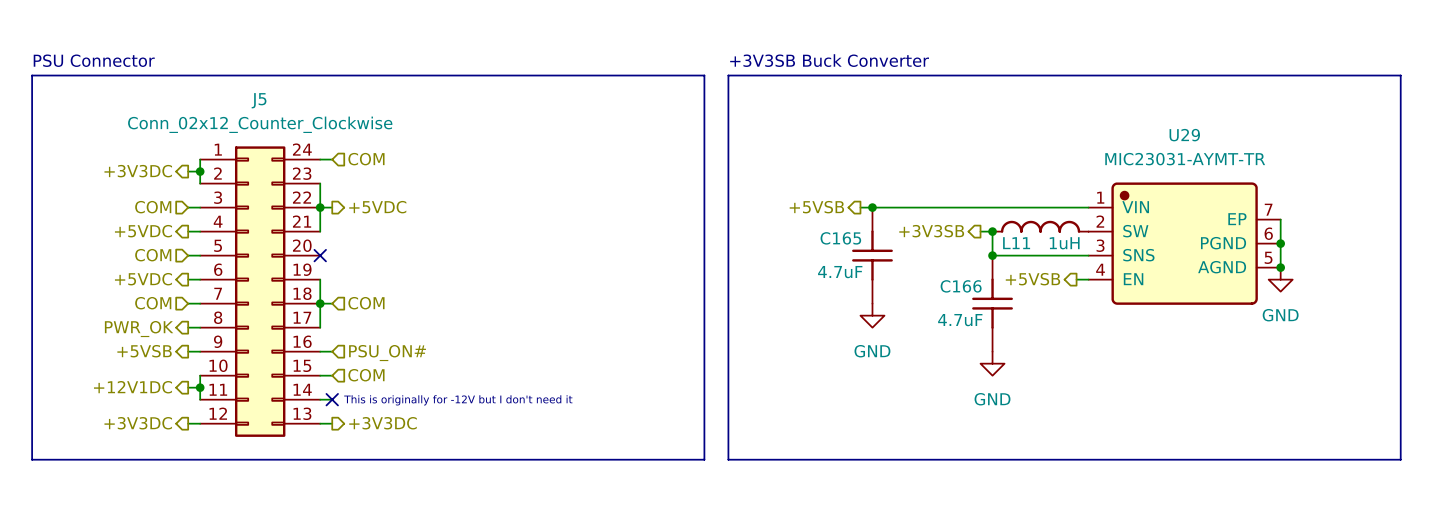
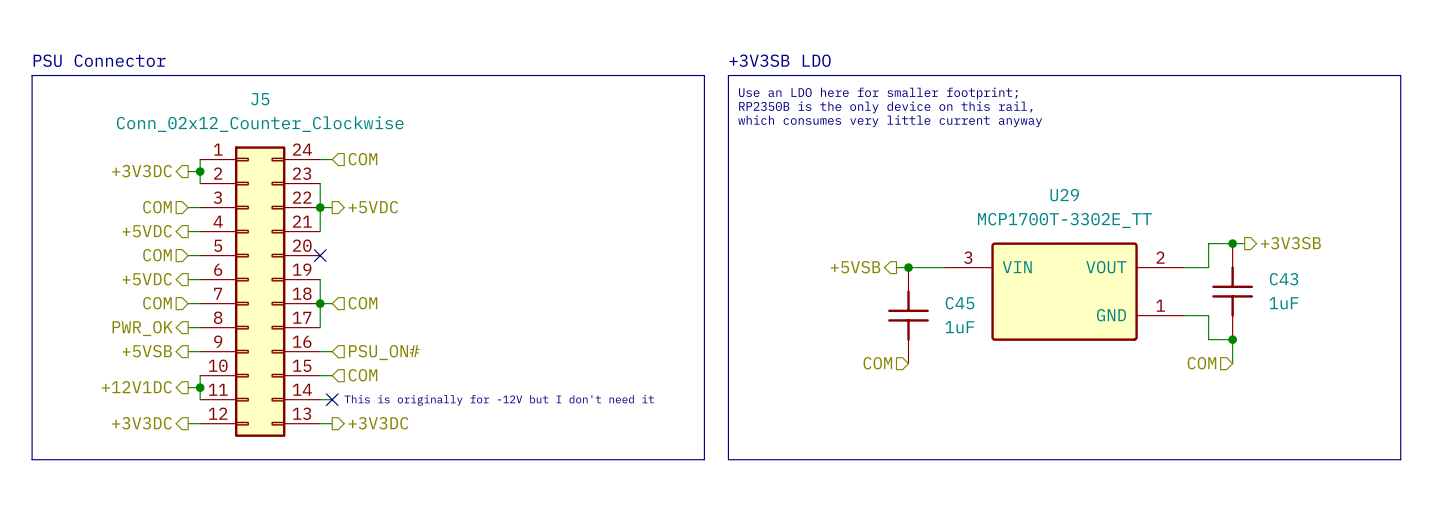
text: +3V3SB Buck Converter (829, 60) -> +3V3SB LDO (780, 60)
text: none -> Use an LDO here for smaller footprint; (878, 93)
text: none -> RP2350B is the only device on this rail, (885, 107)
text: none -> which consumes very little current anyway (890, 121)
U29 value: MIC23031-AYMT-TR (1185, 159) -> MCP1700T-3302E_TT (1064, 220)
U29 symbol: [1088, 182, 1281, 305] -> [944, 242, 1185, 341]
hierarchical label position: +5VSB (816, 207) -> +5VSB (855, 267)
wire: (860, 207) (1088, 207) -> none
junction: (872, 207) -> none
wire: (1280, 219) (1280, 267) -> none
L11: 1uH (1040, 226) -> none
hierarchical label: +3V3SB (931, 231) -> none
junction: (992, 231) -> none
junction: none -> (1232, 243)
junction: (1280, 243) -> none
hierarchical label: none -> +3V3SB (1290, 243)
C165: 4.7uF (872, 255) -> none
junction: (992, 255) -> none
wire: none -> (896, 267) (944, 267)
junction: none -> (908, 267)
junction: (1280, 267) -> none
hierarchical label: +5VSB (1032, 279) -> none
power symbol: GND (1280, 279) -> none
C43: none -> 1uF (1232, 291)
C166: 4.7uF (992, 303) -> none
power symbol: GND (872, 315) -> none
C45: none -> 1uF (908, 315)
wire: none -> (1184, 315) (1208, 315) (1208, 339) (1232, 339) (1232, 363)
junction: none -> (1232, 339)
hierarchical label: none -> COM (877, 363)
power symbol: GND (992, 363) -> none
hierarchical label: none -> COM (1201, 363)

